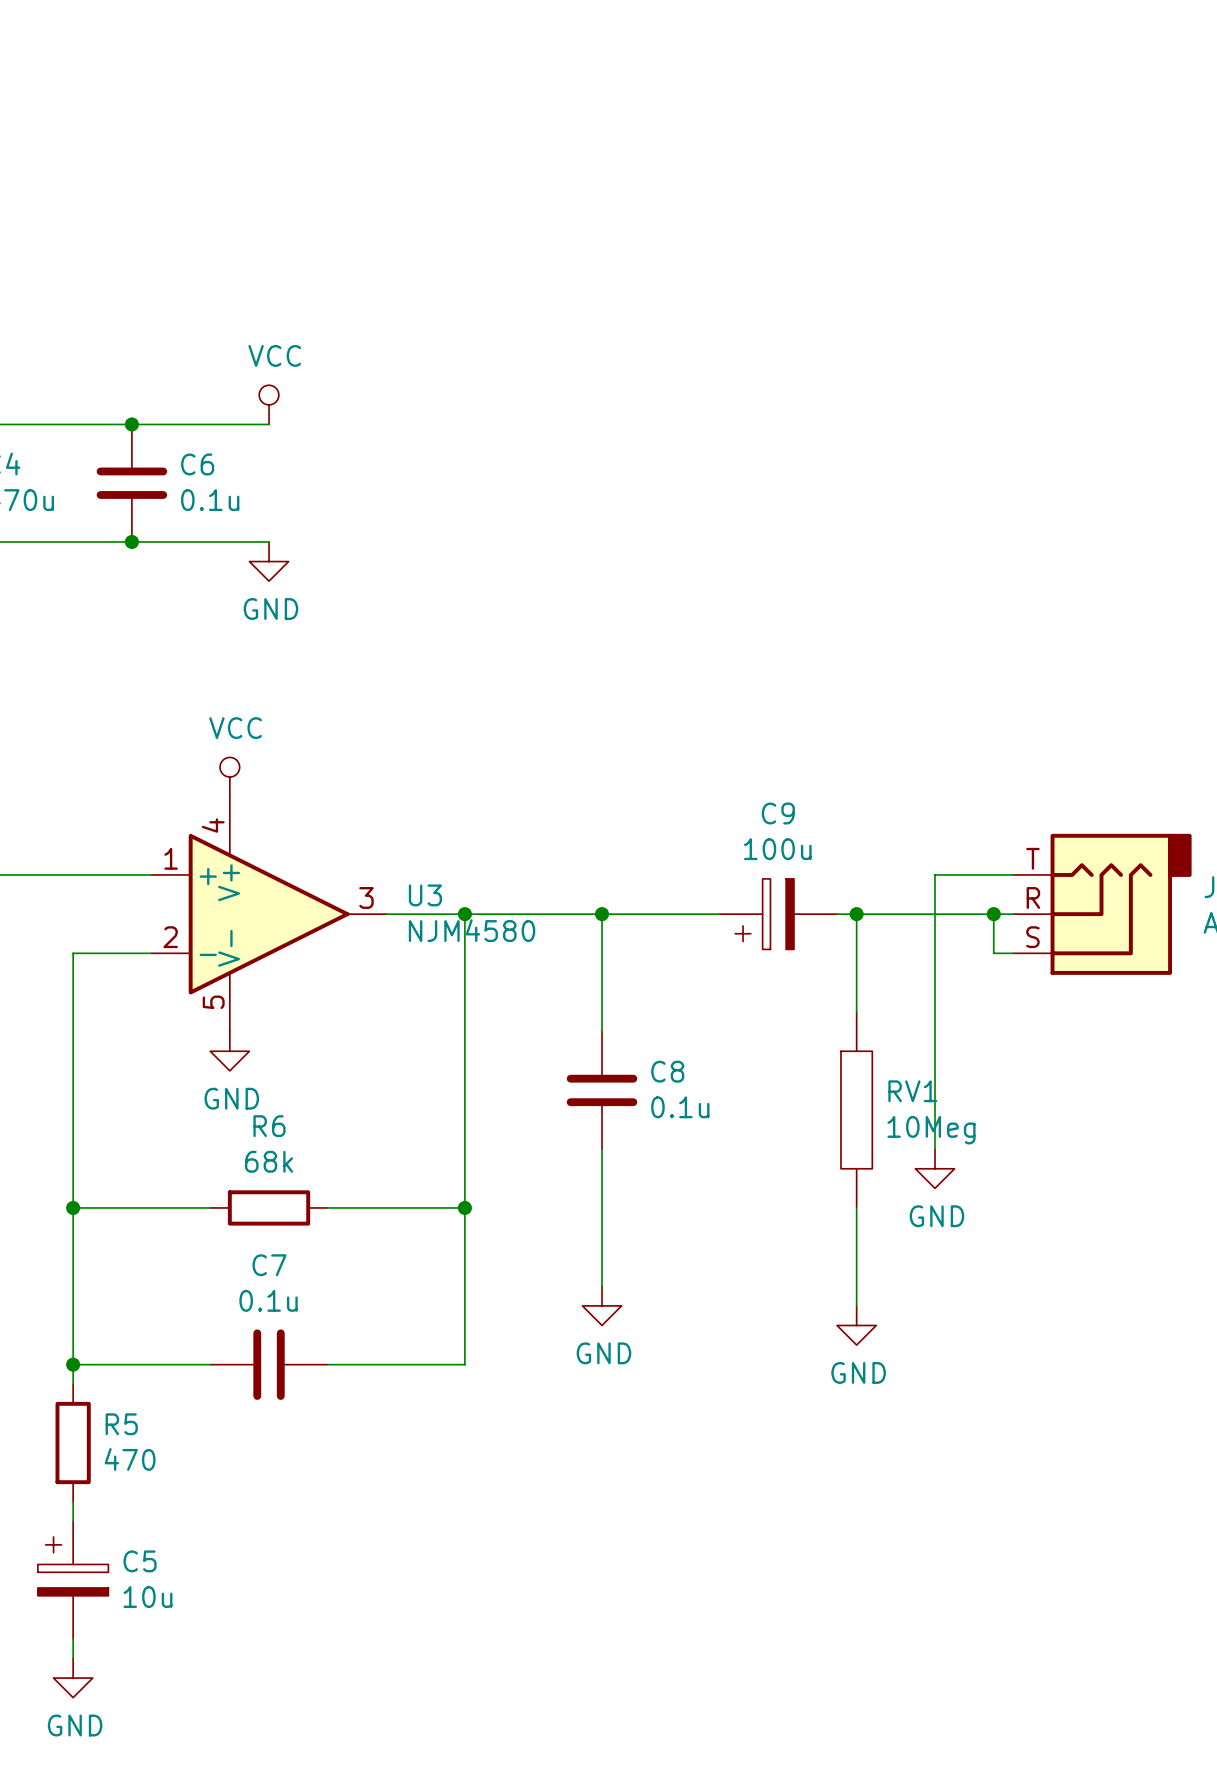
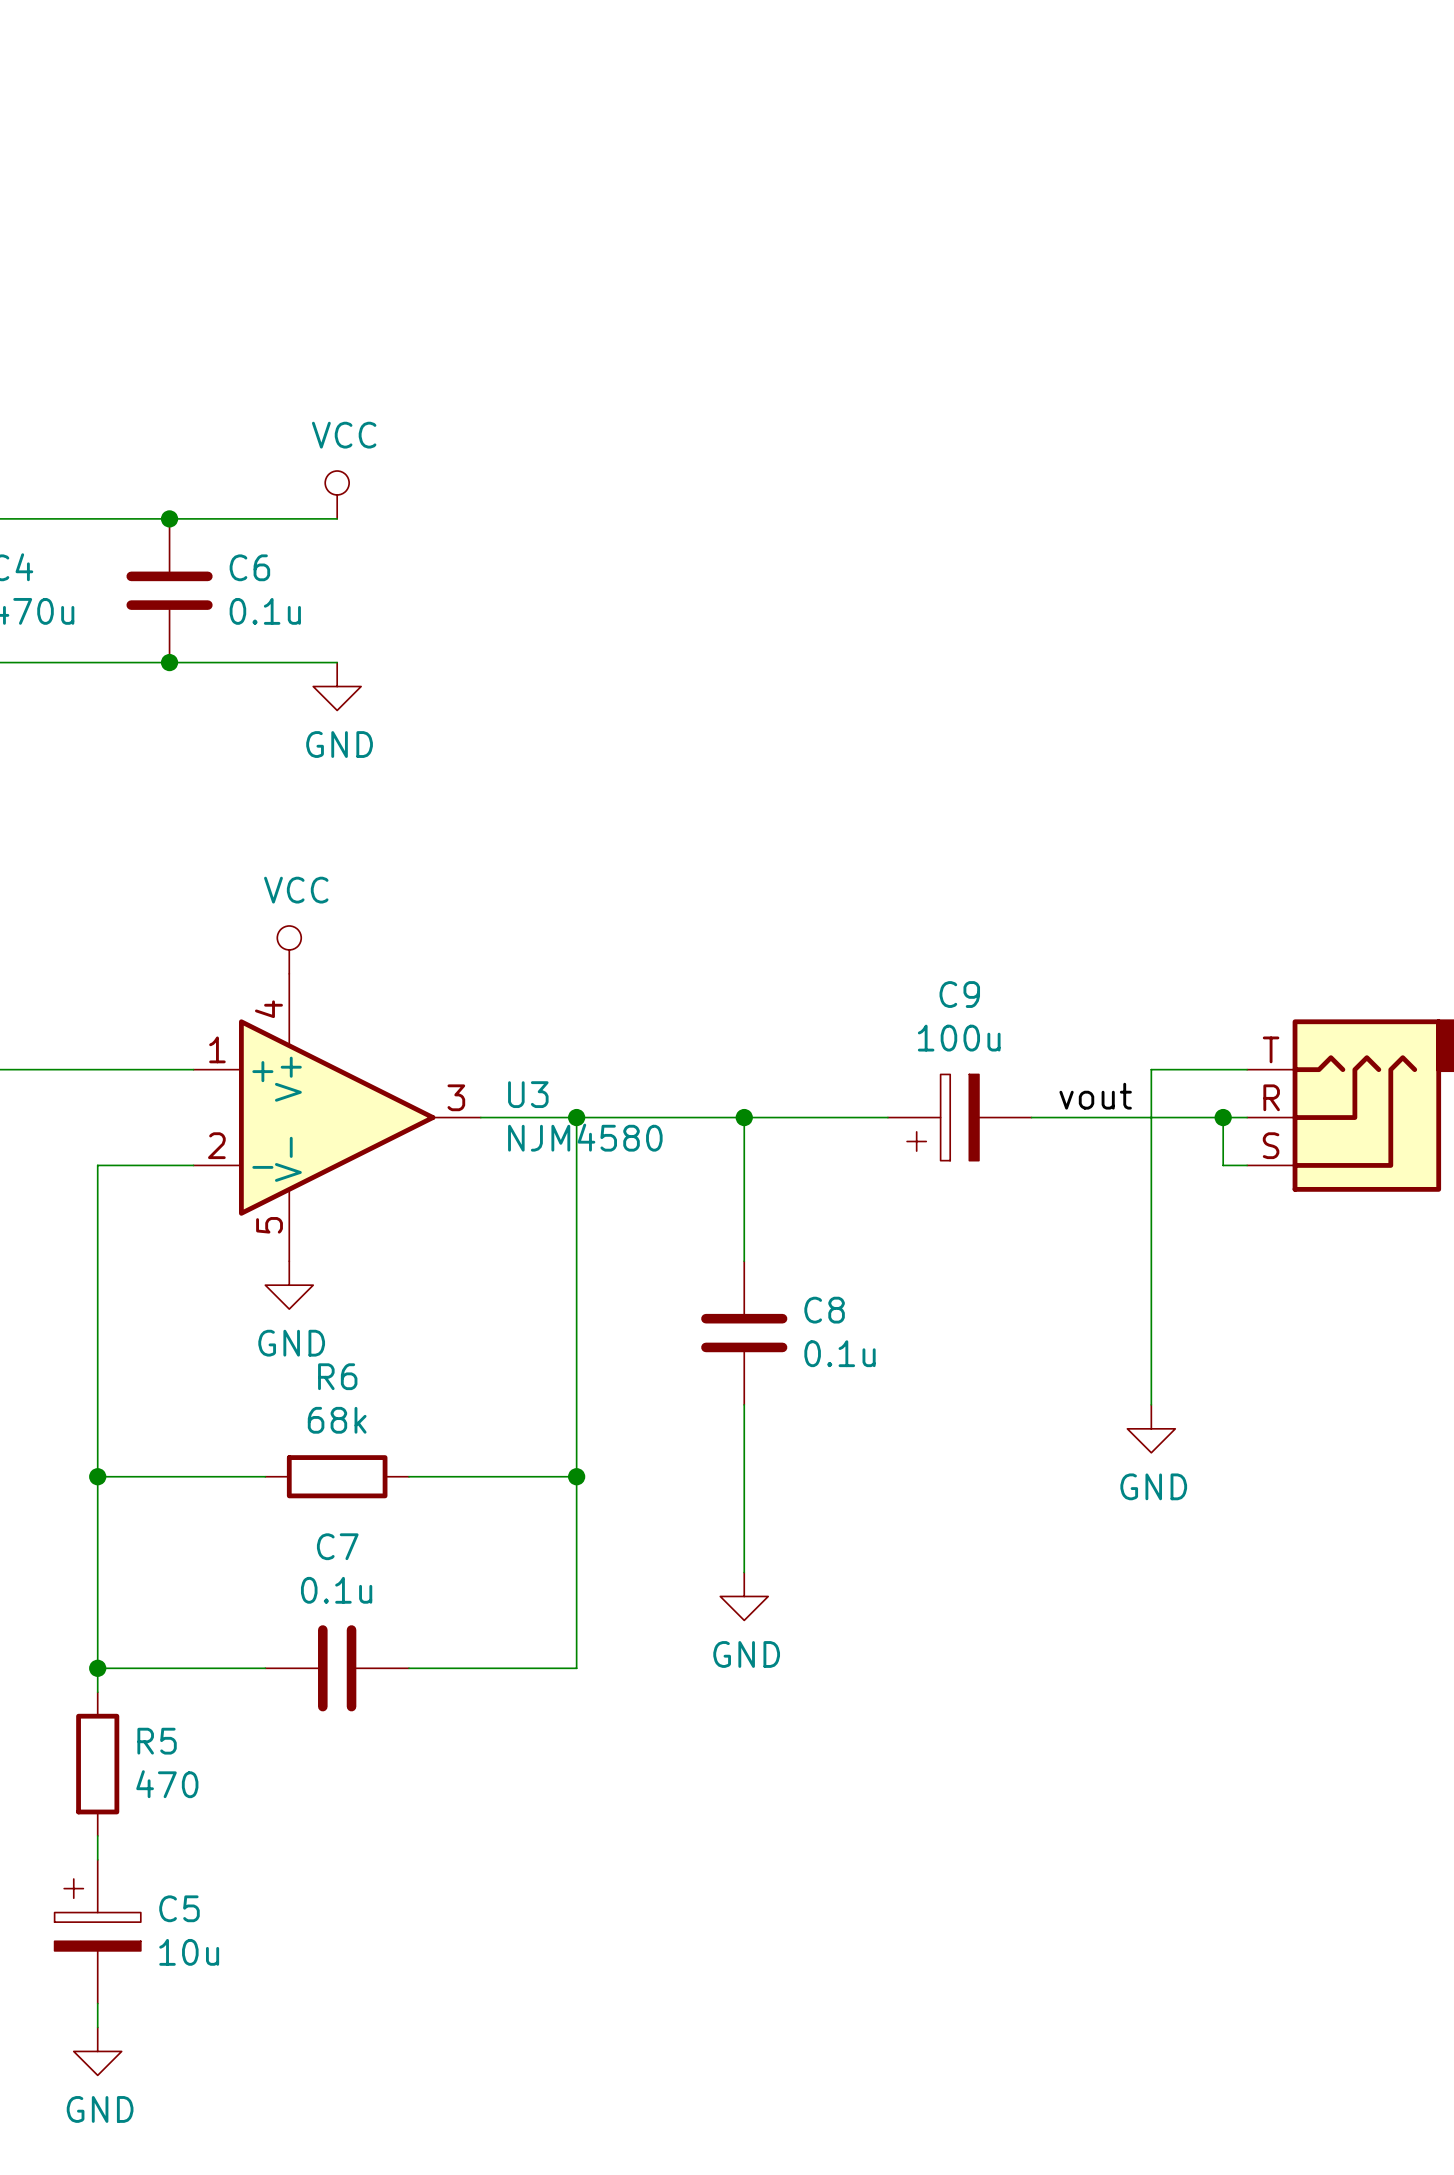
label: none -> vout (1095, 1096)
wire: (856, 914) (856, 1012) -> none
junction: (856, 914) -> none
RV1: 10Meg (856, 1110) -> none
wire: (856, 1207) (856, 1305) -> none
power symbol: GND (856, 1325) -> none

